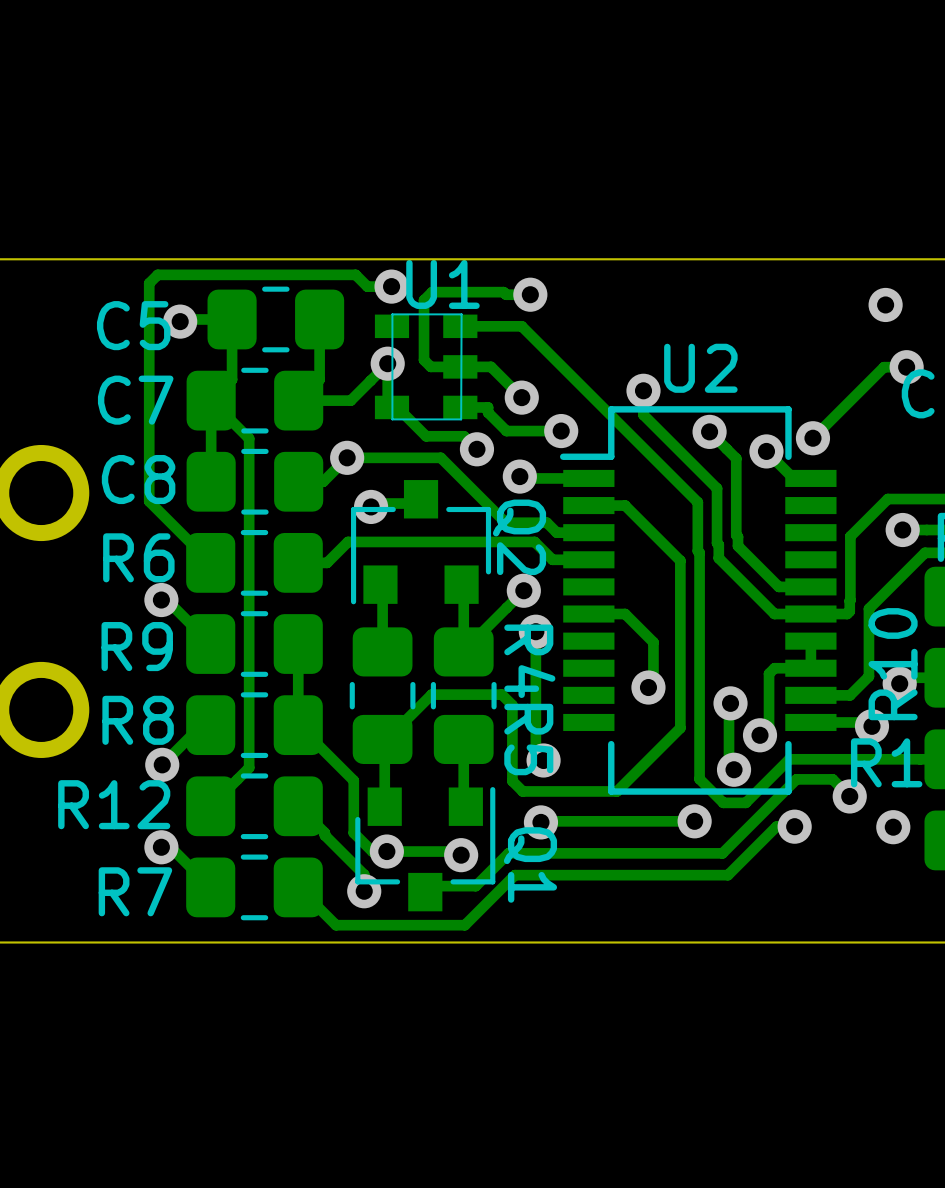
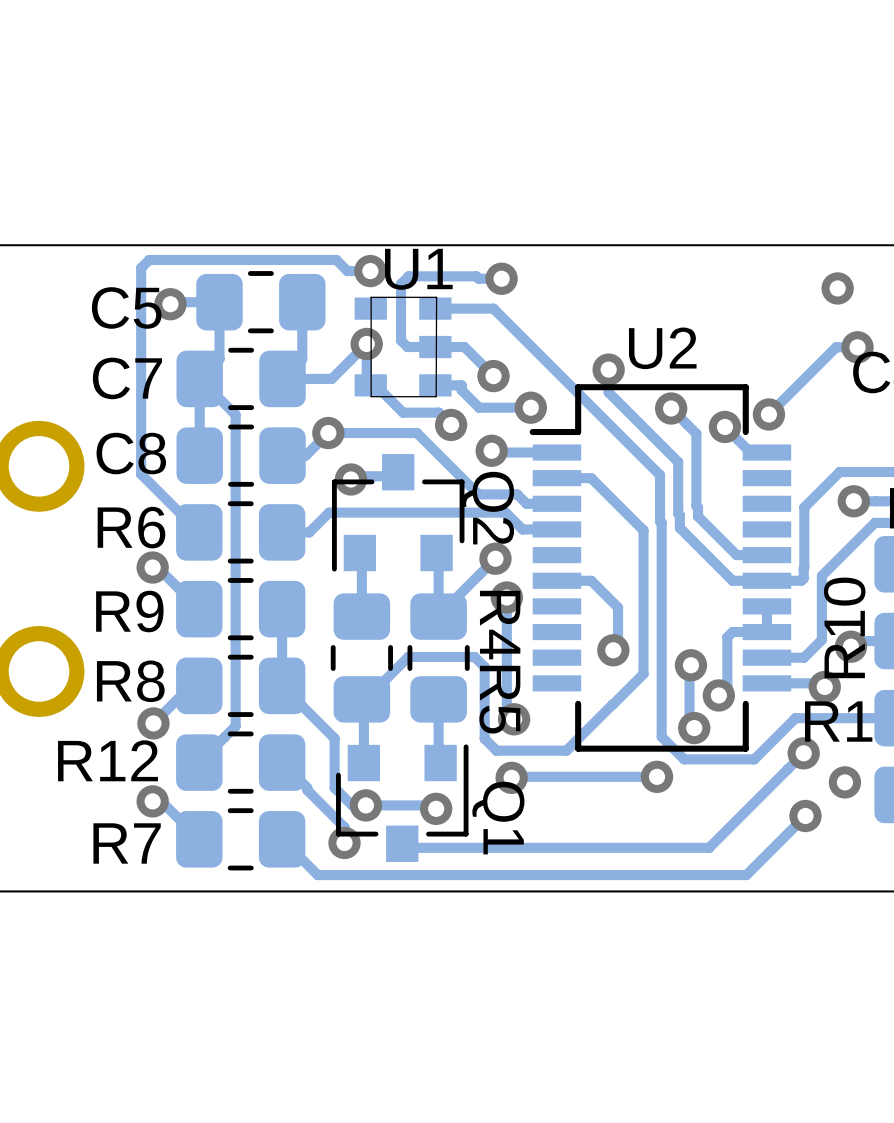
track: (680, 712) (680, 728) (617, 791) (522, 791) -> (612, 704) (566, 750) (496, 750) (494, 748)
track: none -> (643, 674) (612, 704)
track: (841, 759) (789, 759) (745, 802) -> (795, 718) (754, 759) (705, 759)
track: (849, 796) (832, 779) (796, 779) (722, 853) (508, 853) (475, 886) (435, 886) (425, 896) -> (803, 753) (709, 847) (402, 847)
track: (794, 826) (776, 826) (727, 875) (514, 875) (464, 925) -> (805, 815) (746, 875) (439, 875)
via: (794, 826) -> none
via: none -> (805, 815)

